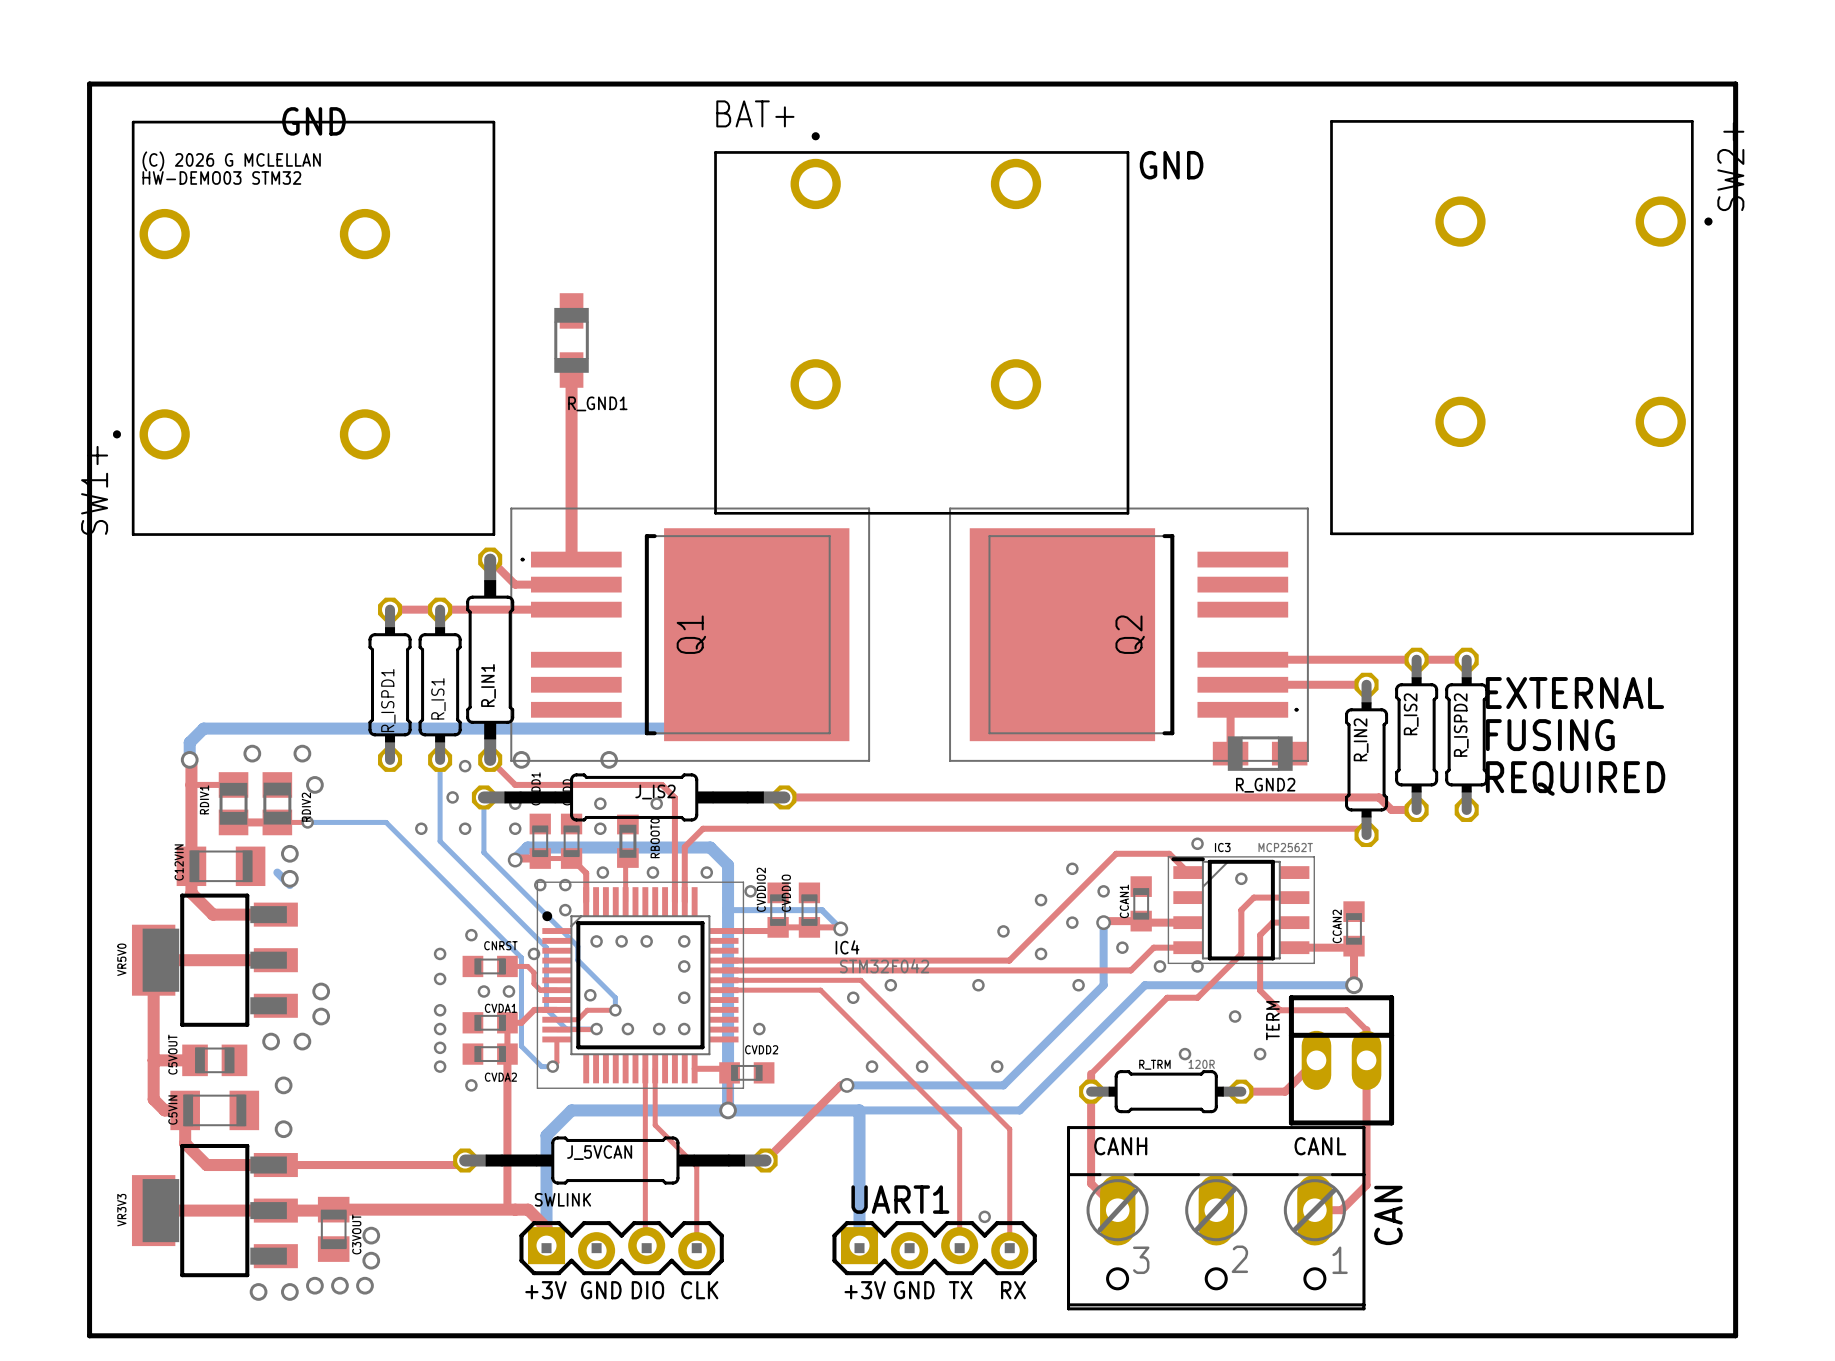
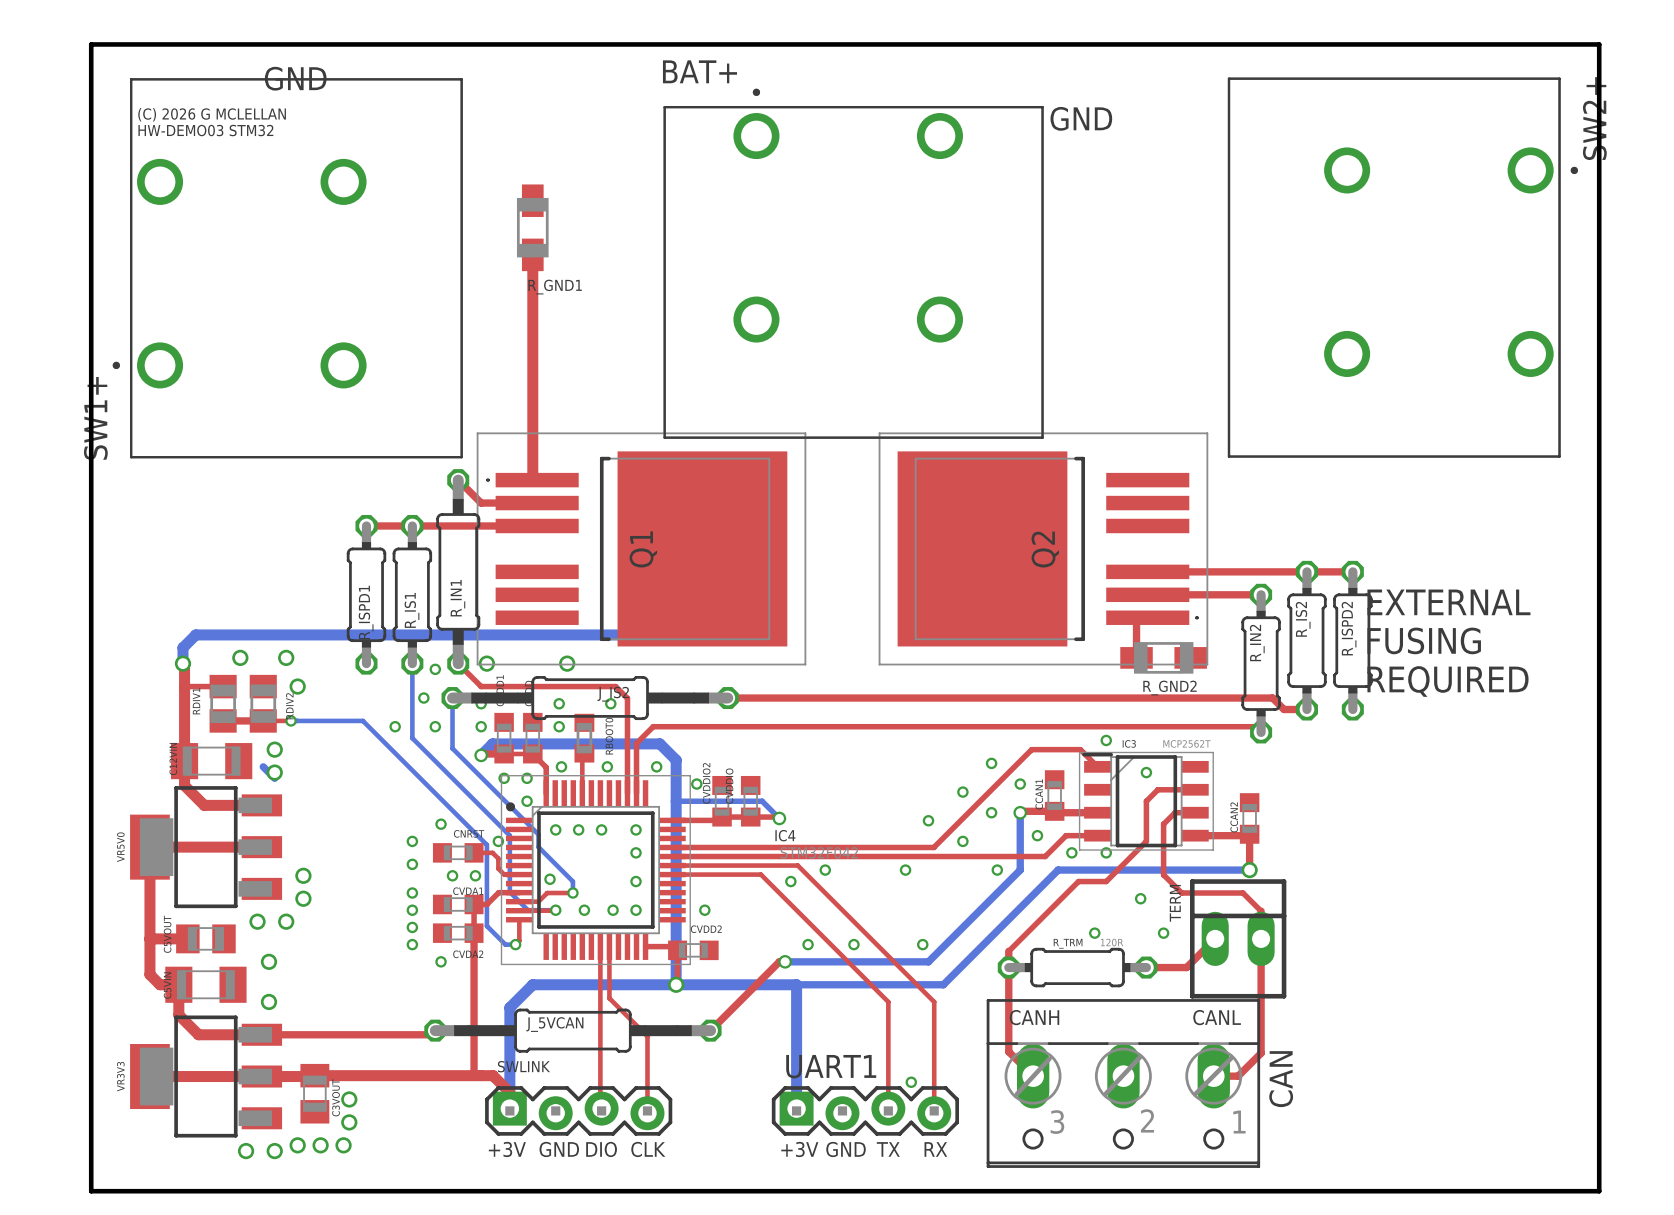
top track: none -> (532, 254) (532, 306)
R_GND1 position: (571, 340) -> (532, 227)

